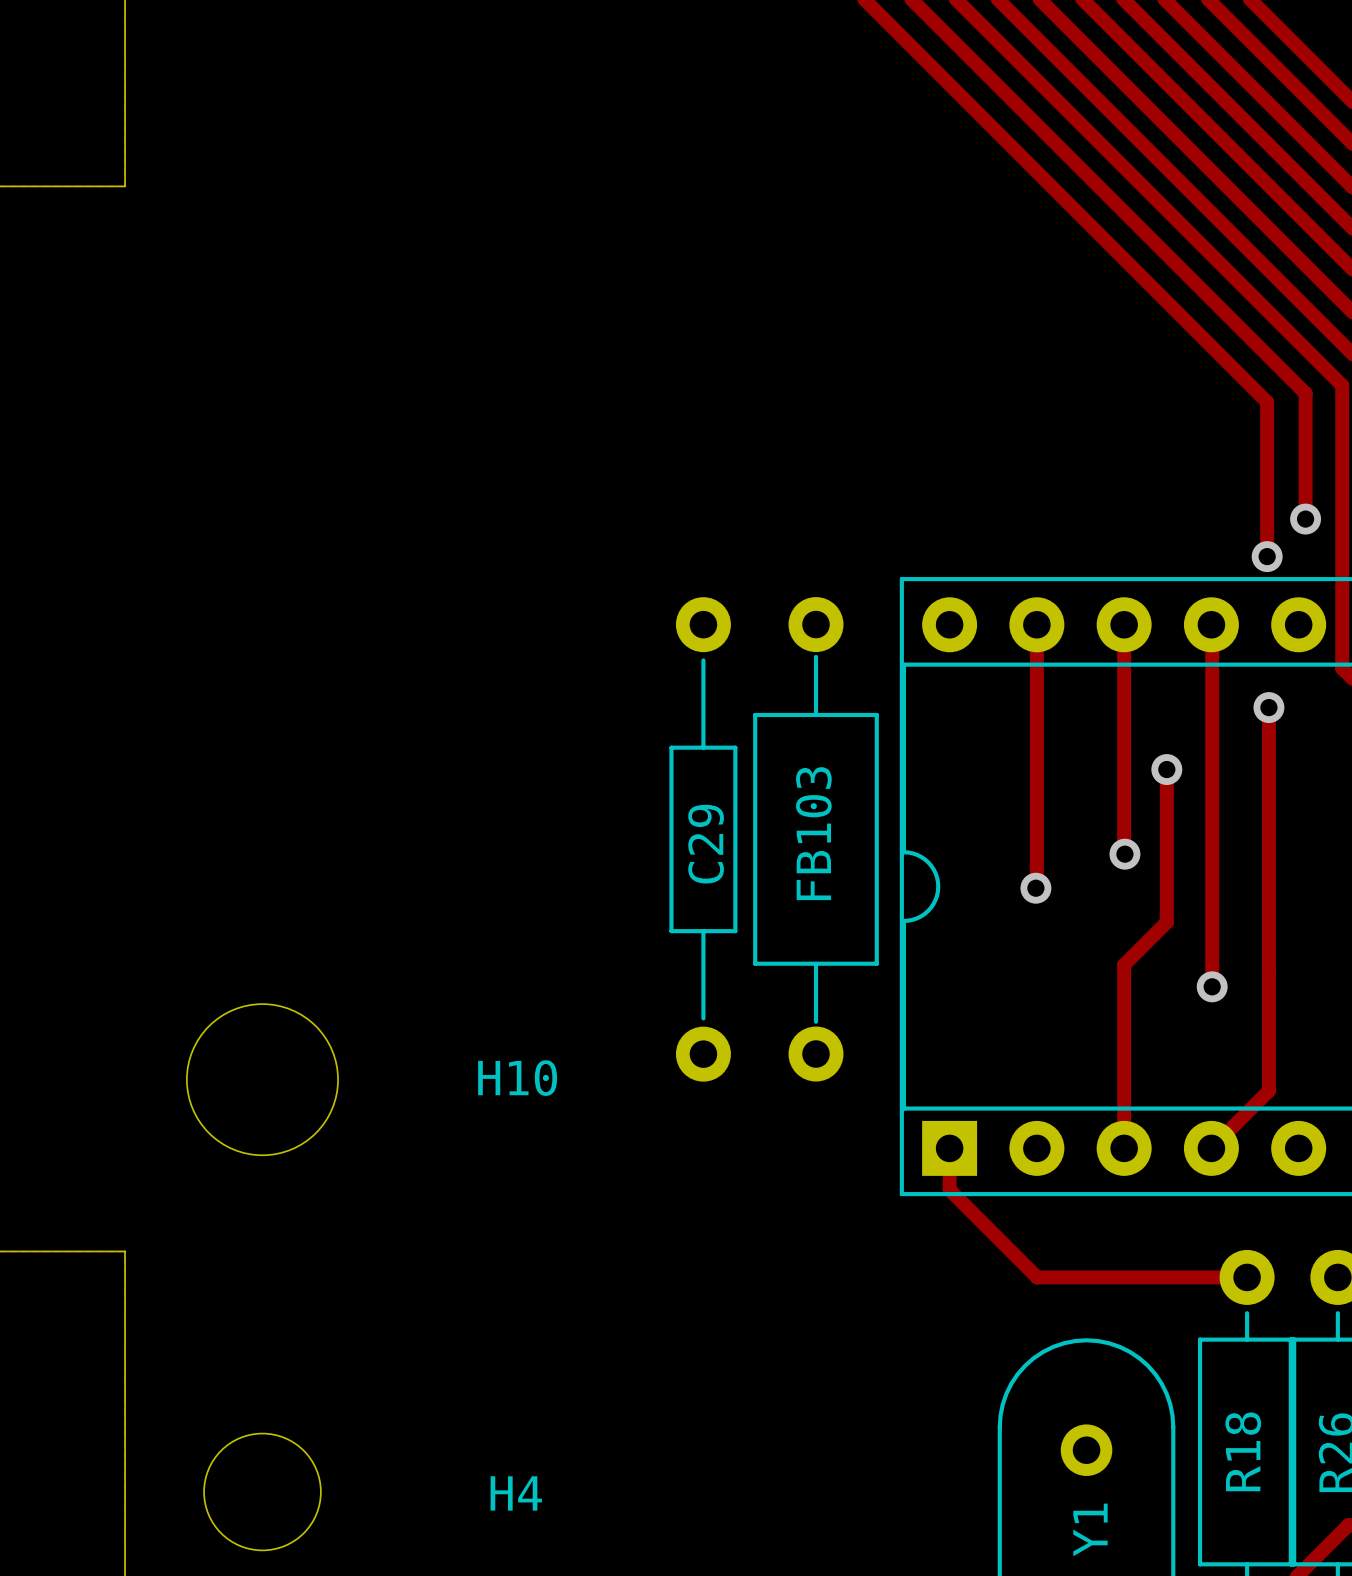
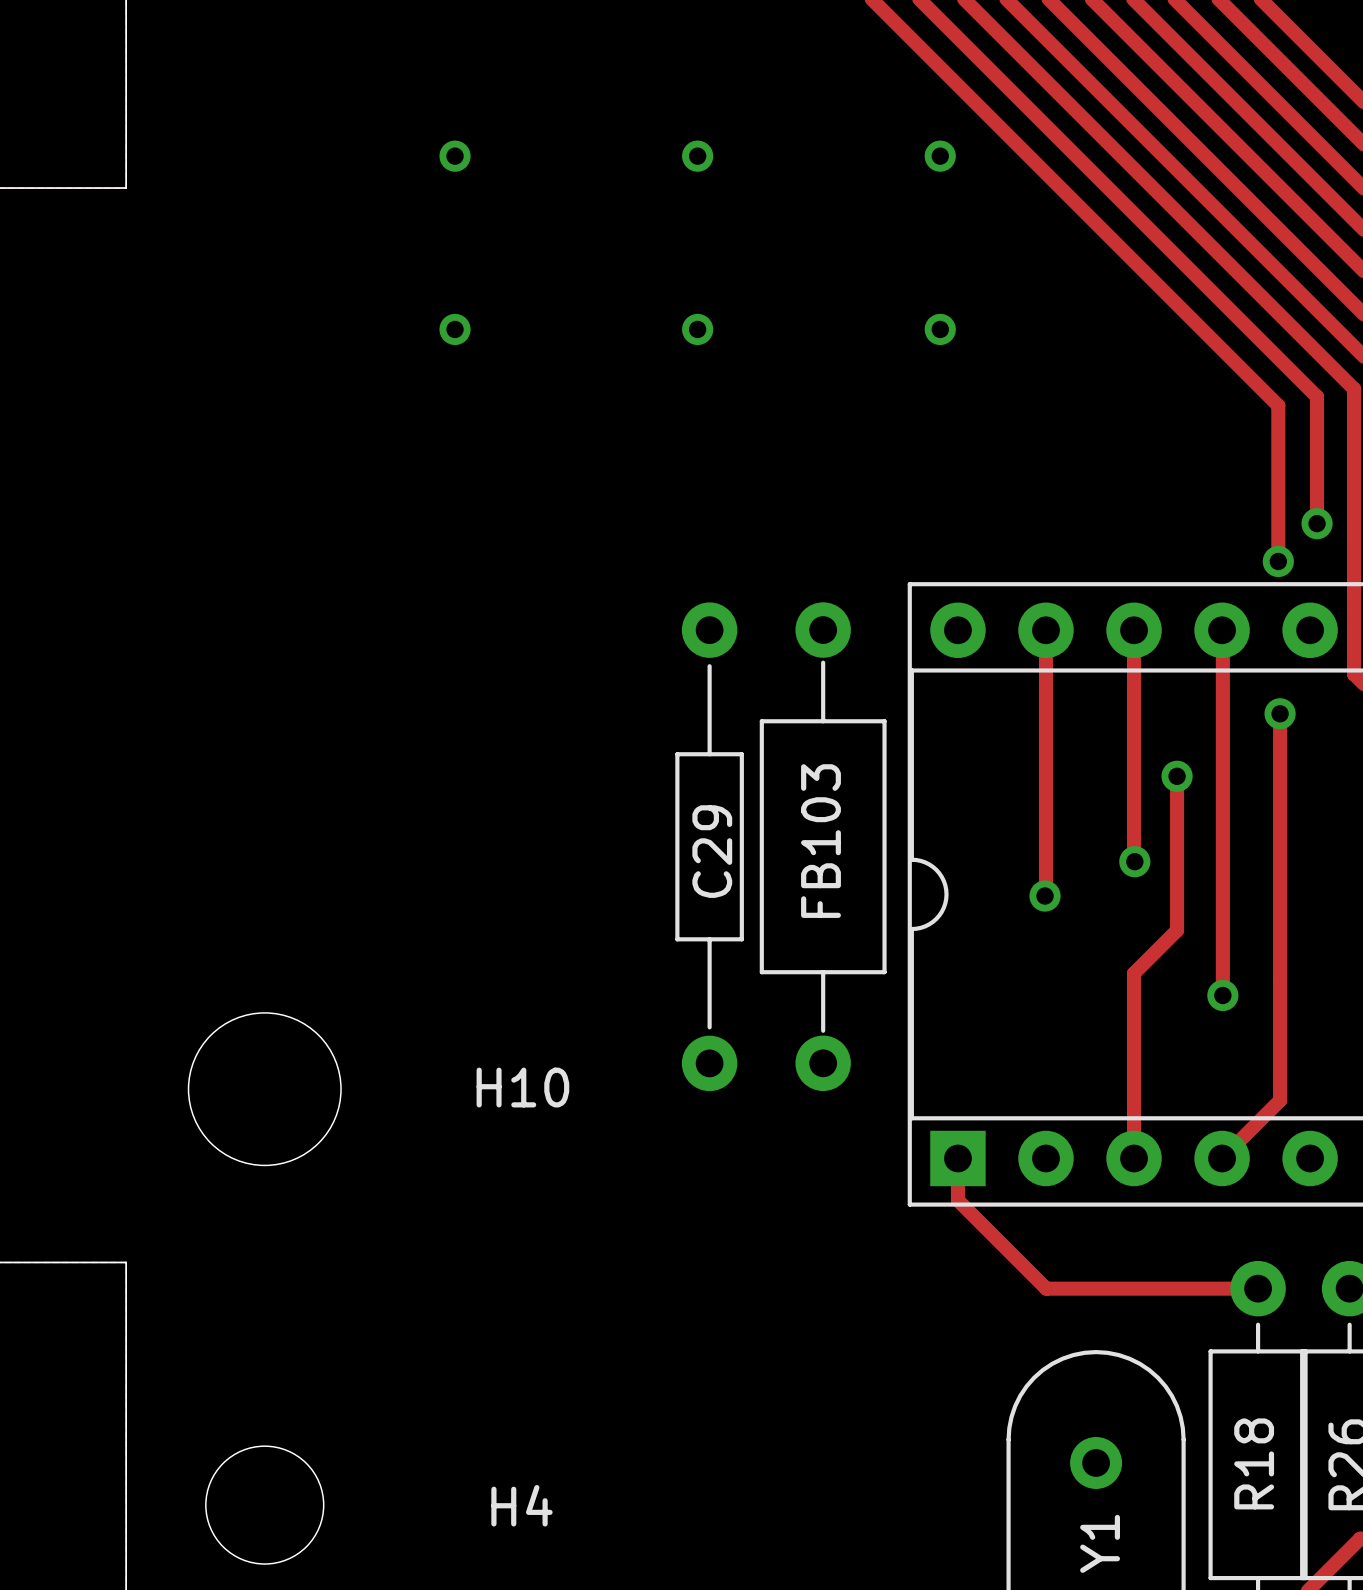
via: none -> (455, 156)
via: none -> (697, 156)
via: none -> (940, 156)
via: none -> (455, 329)
via: none -> (697, 329)
via: none -> (940, 329)

